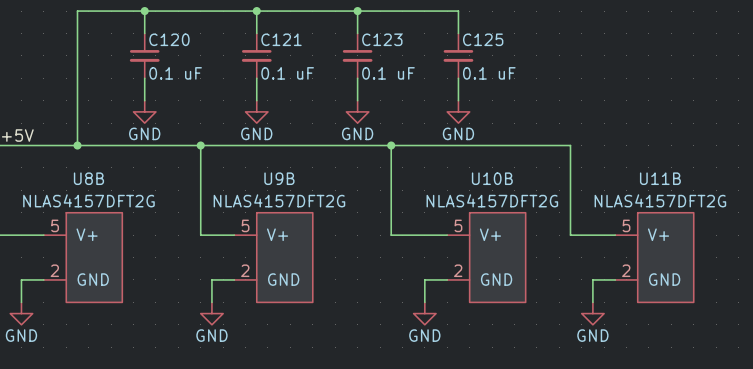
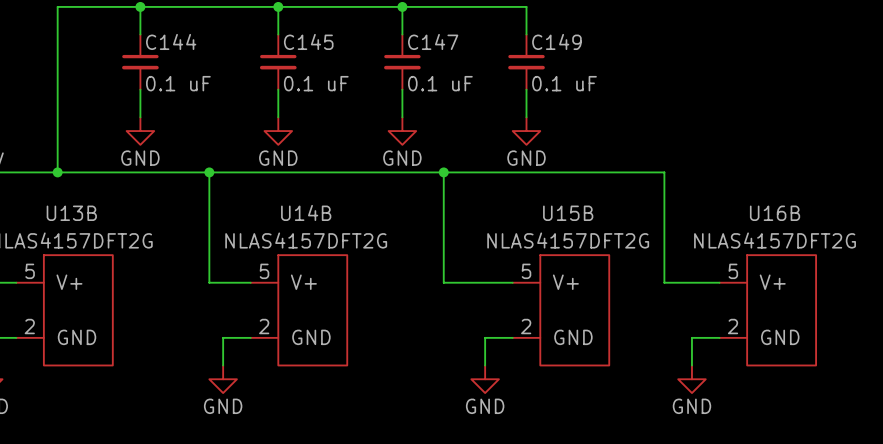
C120 name: C120 (169, 39) -> C144 (171, 41)
C121 name: C121 (281, 39) -> C145 (308, 41)
C123 name: C123 (382, 39) -> C147 (433, 41)
C125 name: C125 (483, 39) -> C149 (556, 41)
U8B name: U8B (88, 178) -> U13B (71, 213)
U9B name: U9B (279, 178) -> U14B (306, 212)
U10B name: U10B (492, 178) -> U15B (568, 213)
U11B name: U11B (660, 178) -> U16B (775, 213)

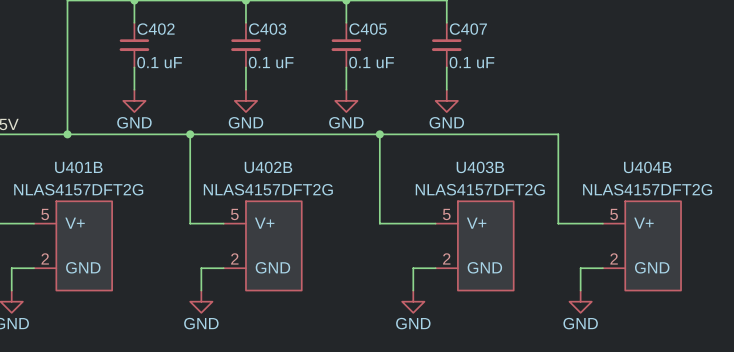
C144 name: C144 (171, 41) -> C402 (156, 29)
C145 name: C145 (308, 41) -> C403 (267, 29)
C147 name: C147 (433, 41) -> C405 (368, 29)
C149 name: C149 (556, 41) -> C407 (468, 29)
U14B name: U14B (306, 212) -> U402B (268, 167)
U13B name: U13B (71, 213) -> U401B (78, 167)
U15B name: U15B (568, 213) -> U403B (480, 167)
U16B name: U16B (775, 213) -> U404B (647, 167)

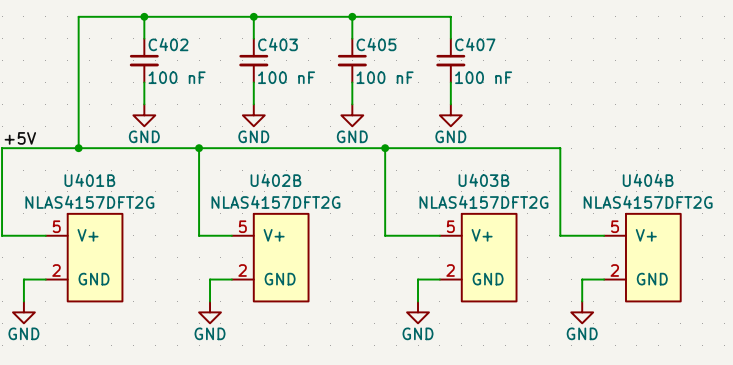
C402 value: 0.1 uF (159, 62) -> 100 nF (177, 77)
C403 value: 0.1 uF (271, 62) -> 100 nF (286, 77)
C405 value: 0.1 uF (371, 62) -> 100 nF (385, 77)
C407 value: 0.1 uF (471, 62) -> 100 nF (483, 77)

